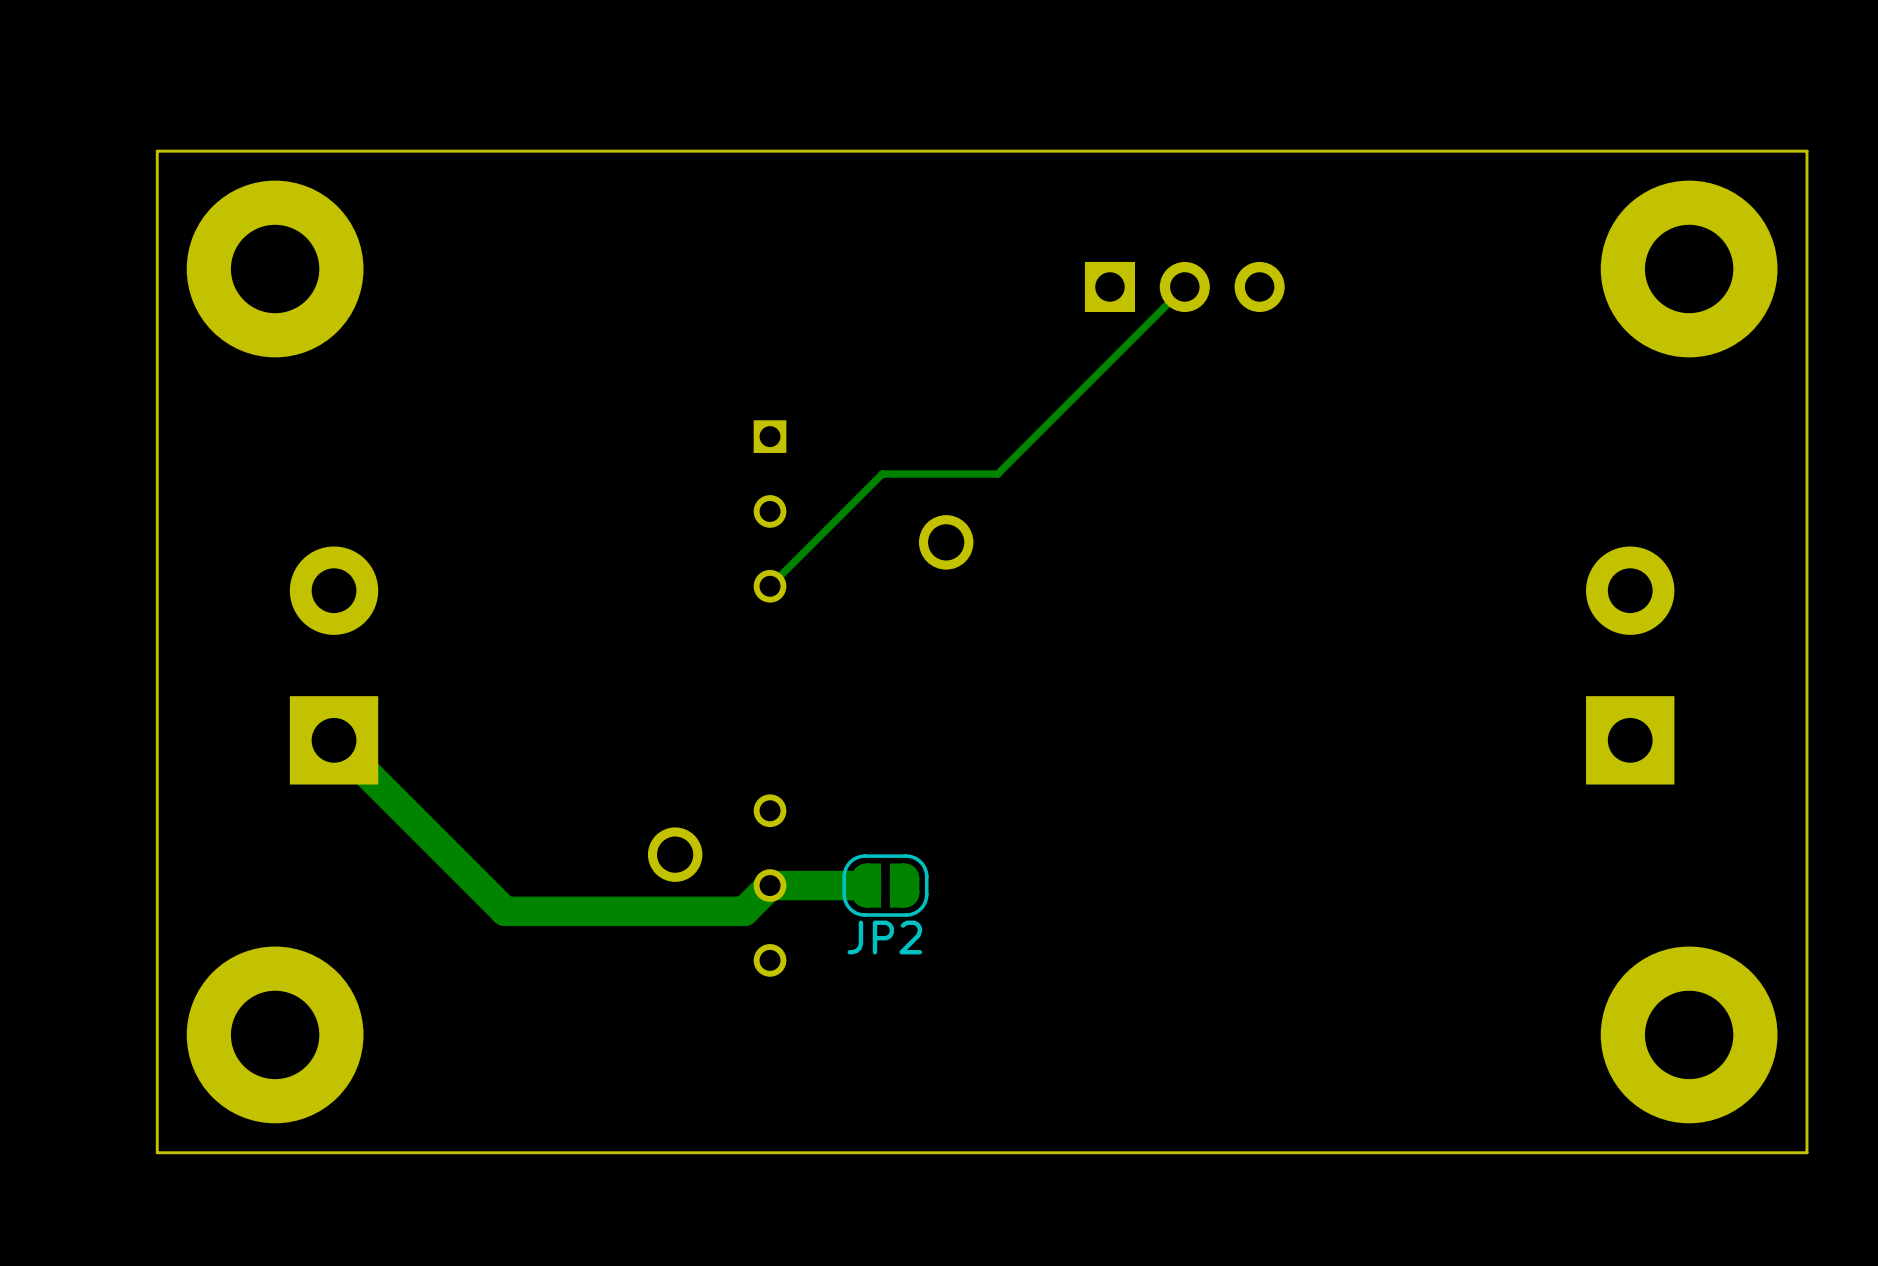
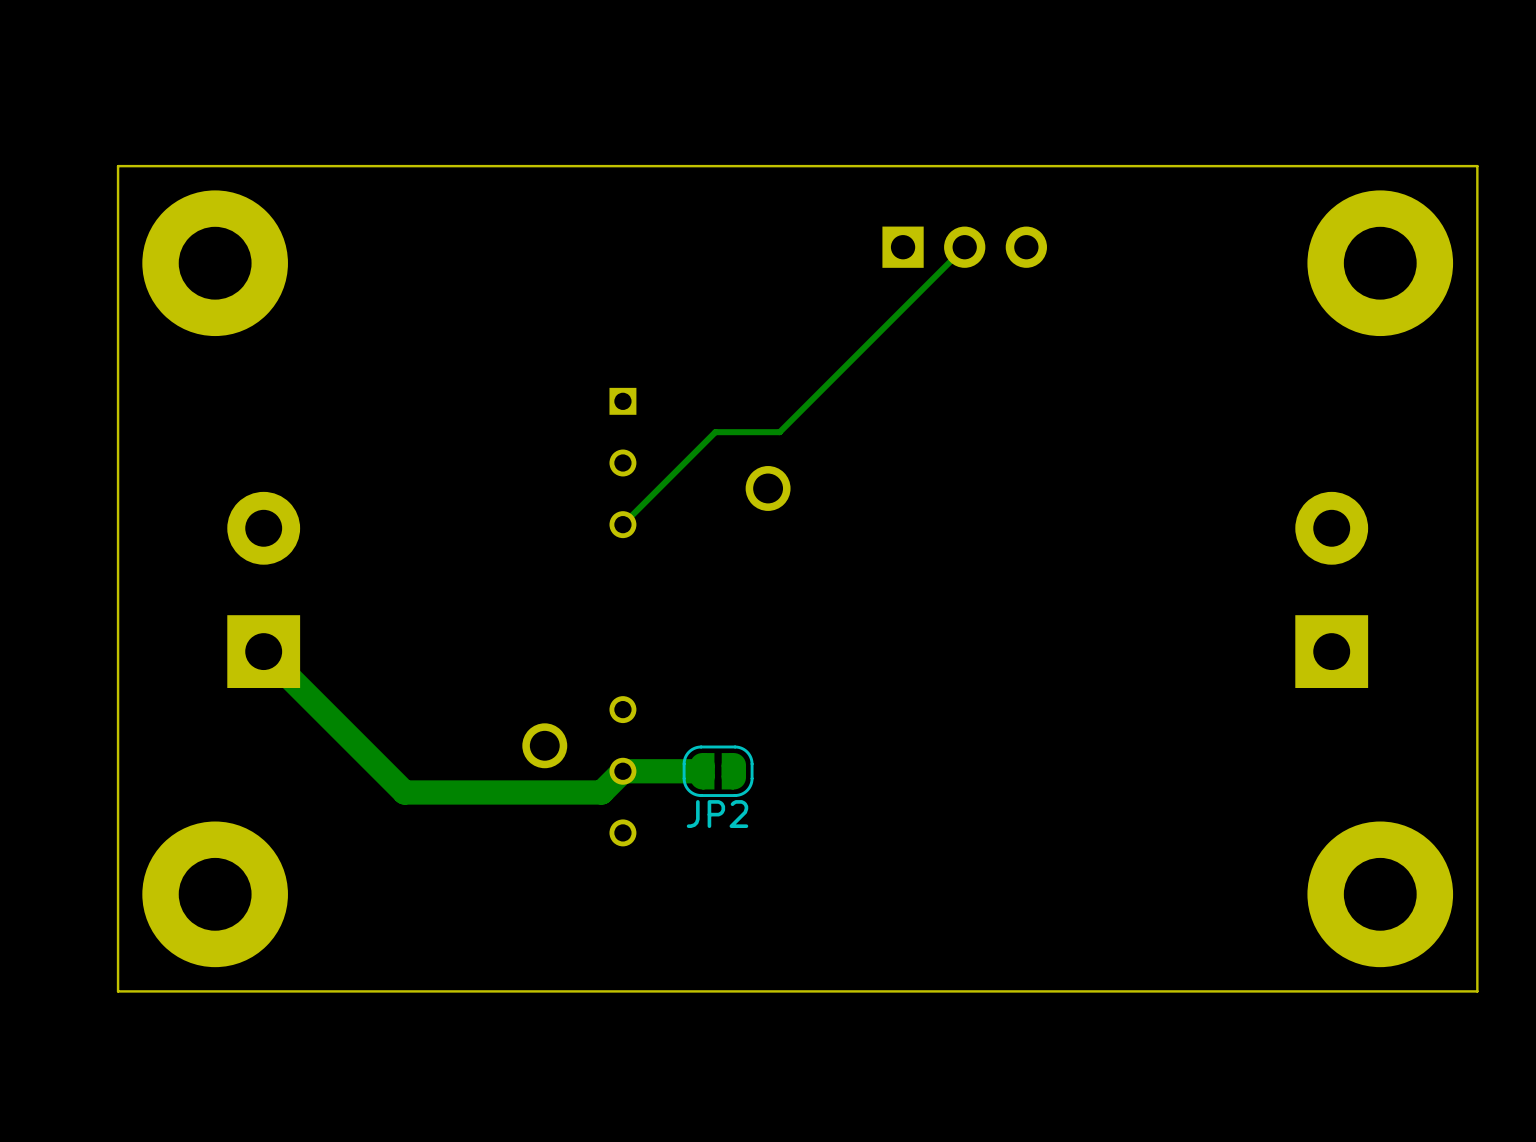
track: (1184, 286) (997, 474) (960, 474) -> (964, 247) (779, 432)
part position: (1184, 286) -> (964, 247)

